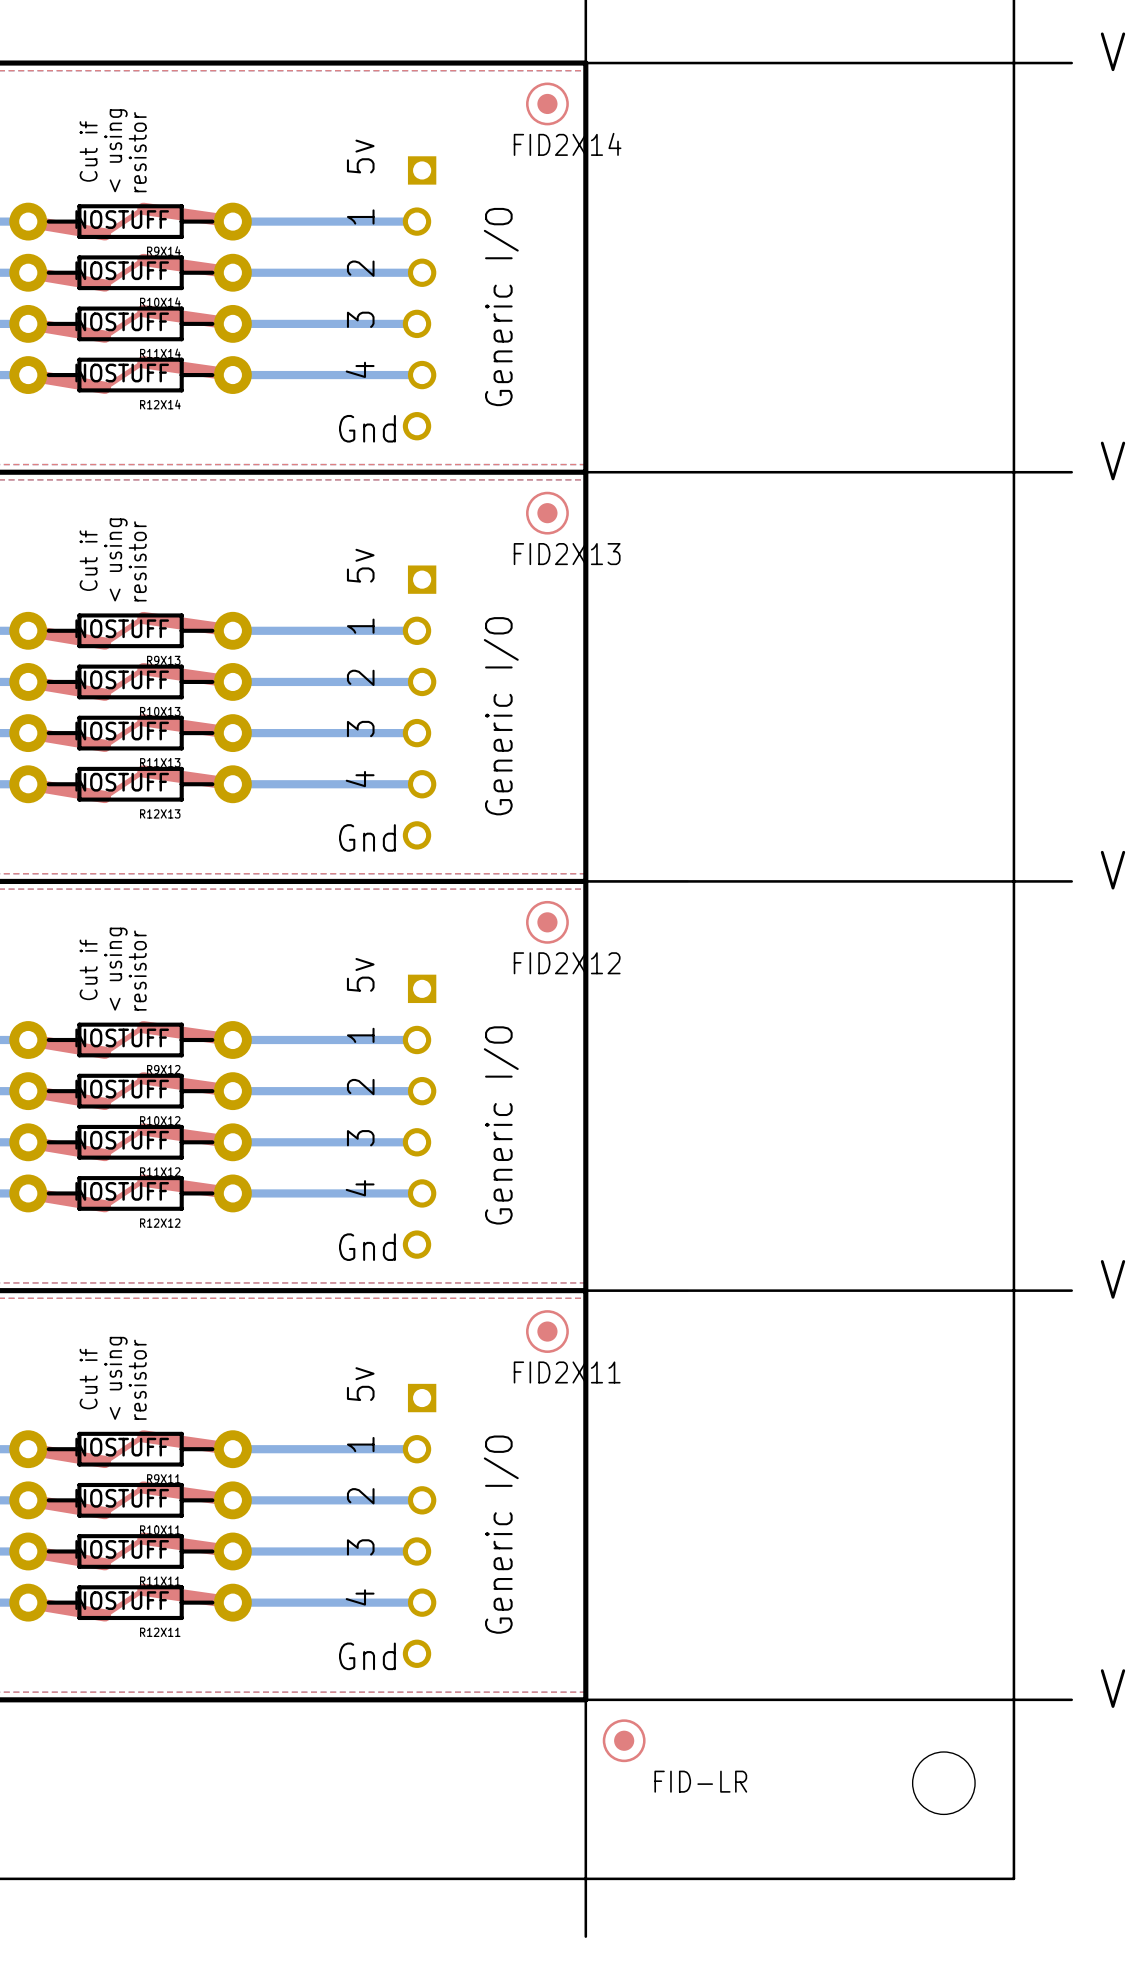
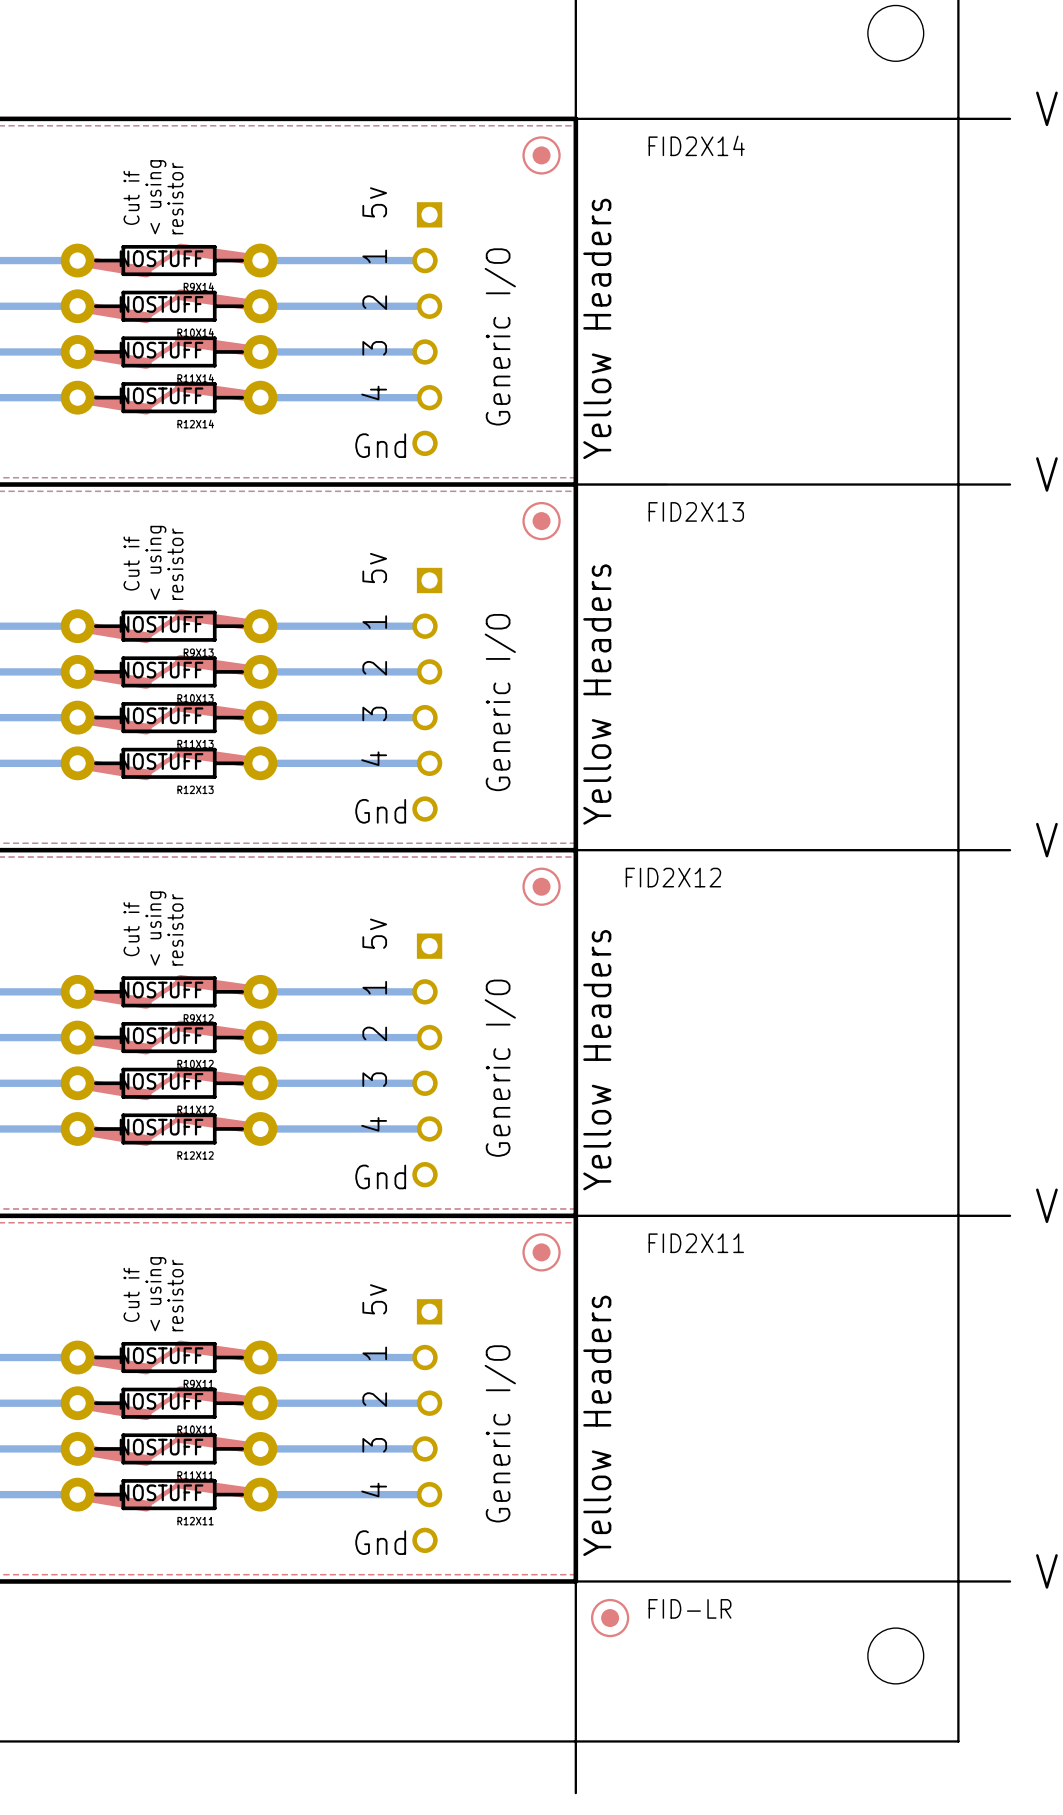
FID2X14 name position: FID2X14 (567, 144) -> FID2X14 (696, 145)
text: none -> Yellow Headers (597, 328)
FID2X13 name position: FID2X13 (567, 554) -> FID2X13 (696, 511)
text: none -> Yellow Headers (597, 694)
FID2X12 name position: FID2X12 (567, 963) -> FID2X12 (673, 877)
text: none -> Yellow Headers (597, 1060)
FID2X11 name position: FID2X11 (567, 1372) -> FID2X11 (696, 1243)
text: none -> Yellow Headers (597, 1425)
FID-LR name position: FID-LR (700, 1781) -> FID-LR (690, 1608)

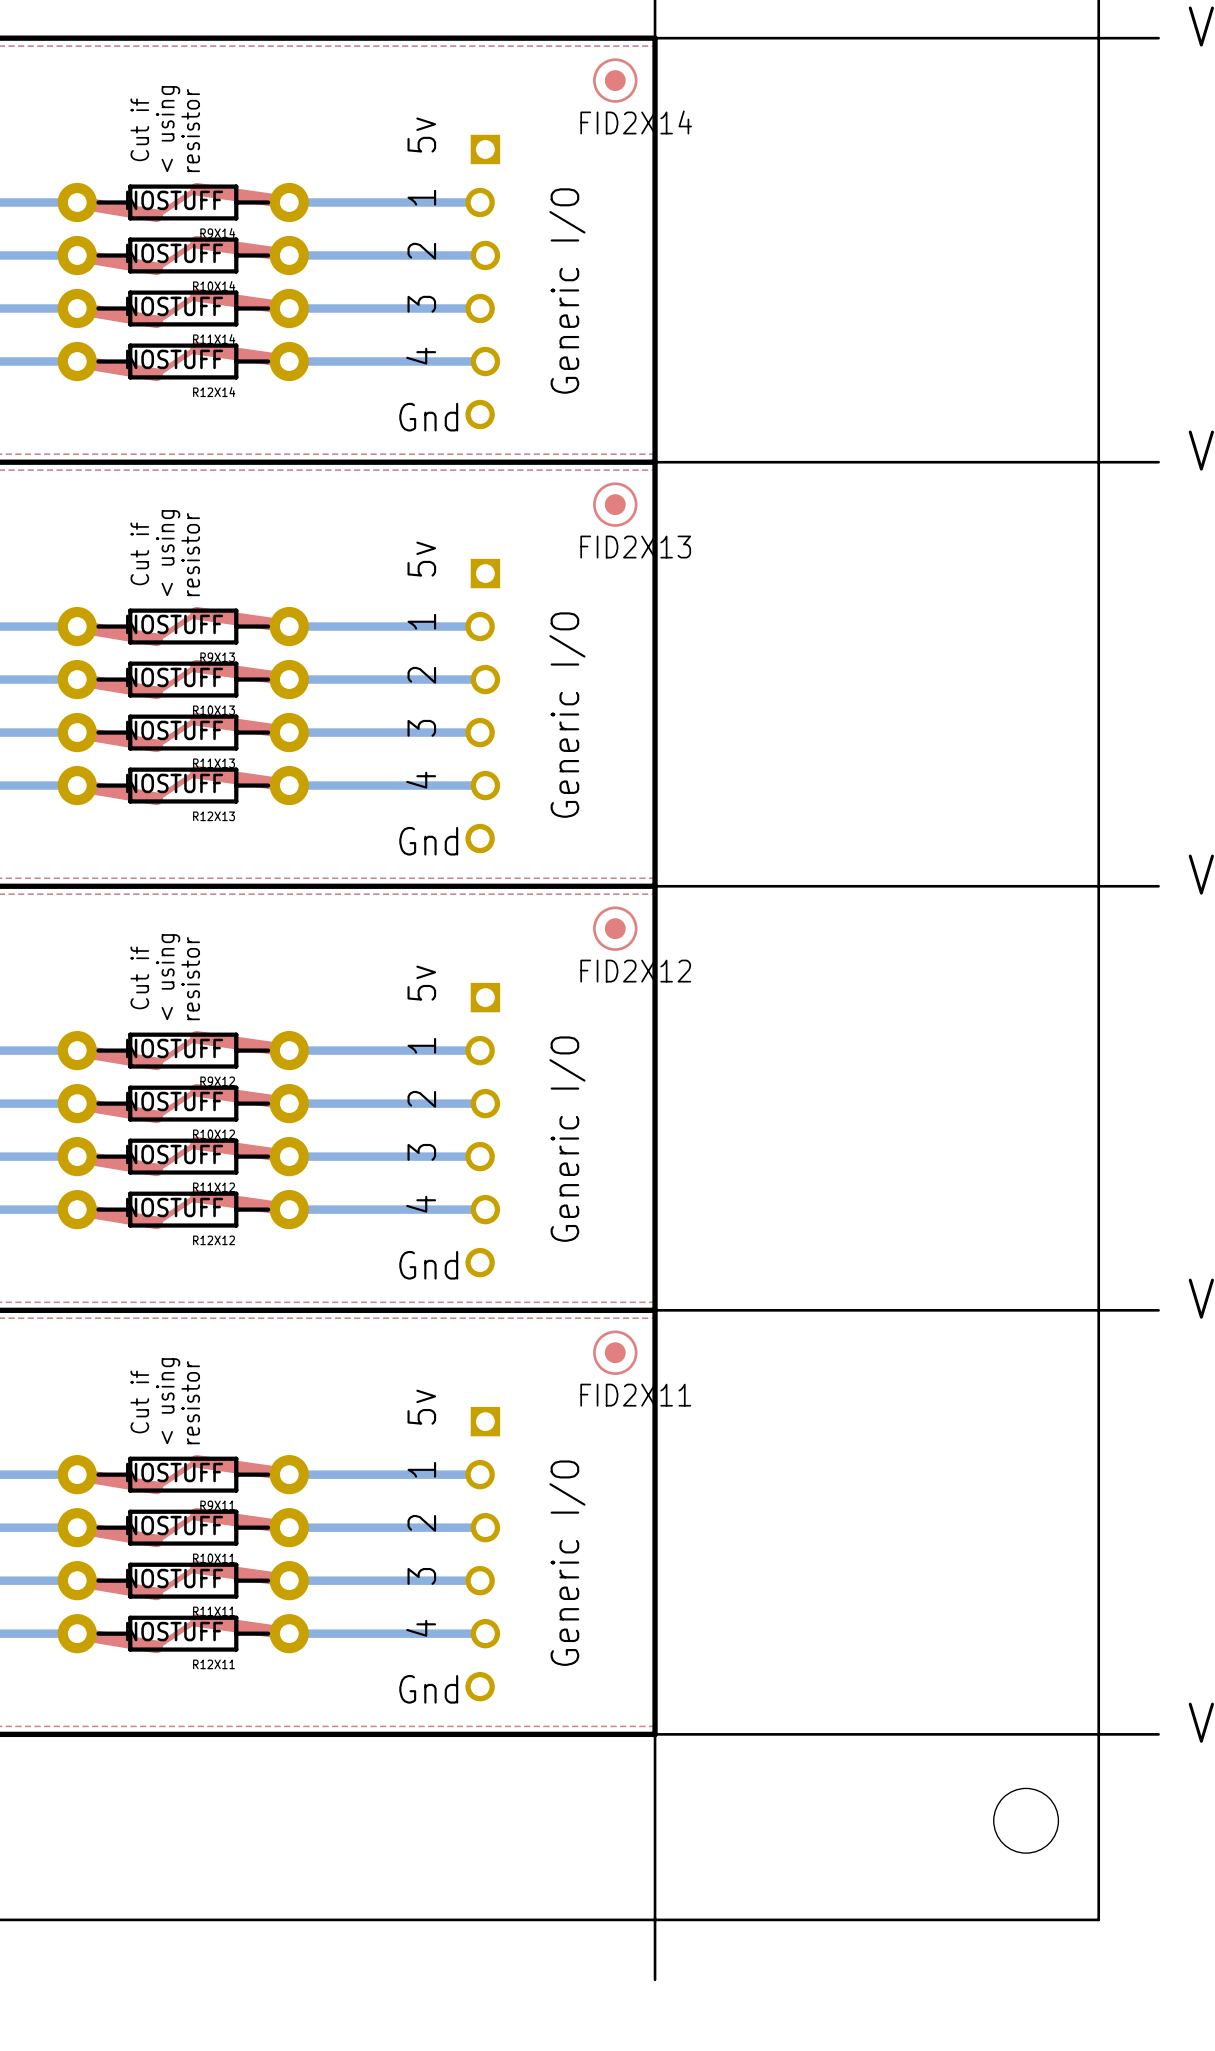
FID2X14 name position: FID2X14 (696, 145) -> FID2X14 (636, 122)
text: Yellow Headers (597, 328) -> none
FID2X13 name position: FID2X13 (696, 511) -> FID2X13 (635, 547)
text: Yellow Headers (597, 694) -> none
FID2X12 name position: FID2X12 (673, 877) -> FID2X12 (635, 971)
text: Yellow Headers (597, 1060) -> none
FID2X11 name position: FID2X11 (696, 1243) -> FID2X11 (635, 1395)
text: Yellow Headers (597, 1425) -> none
FID-LR: (610, 1618) -> none

